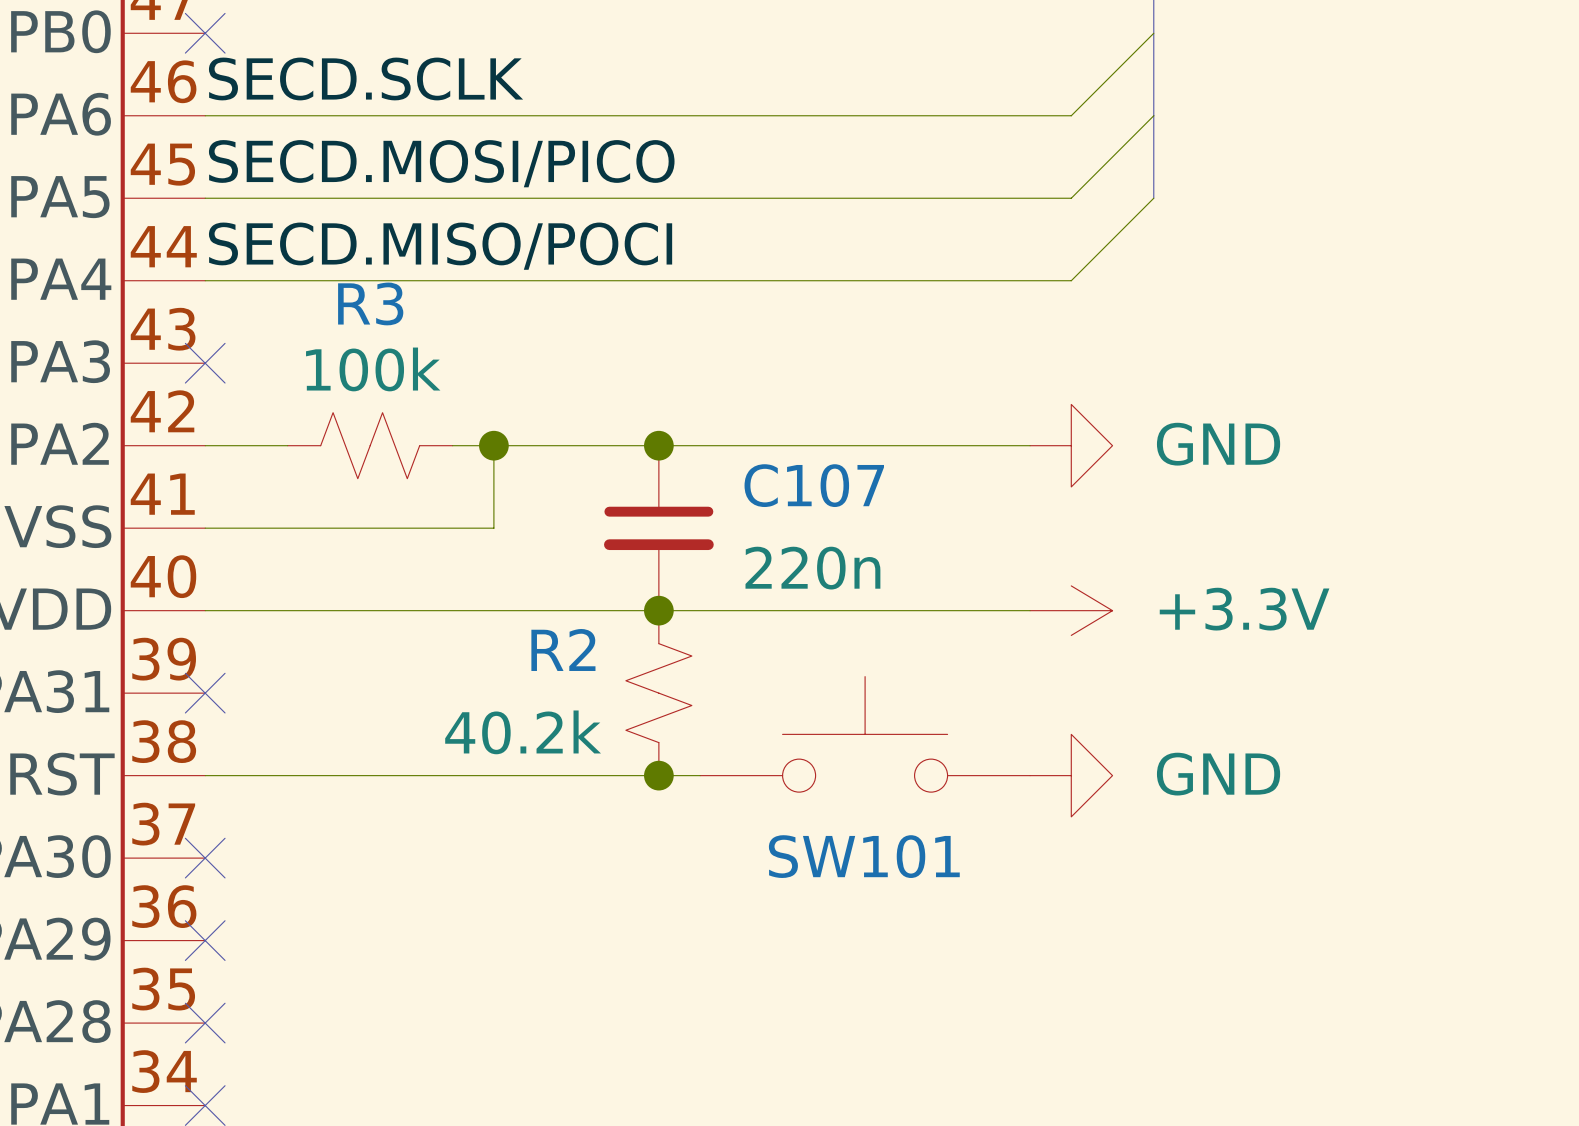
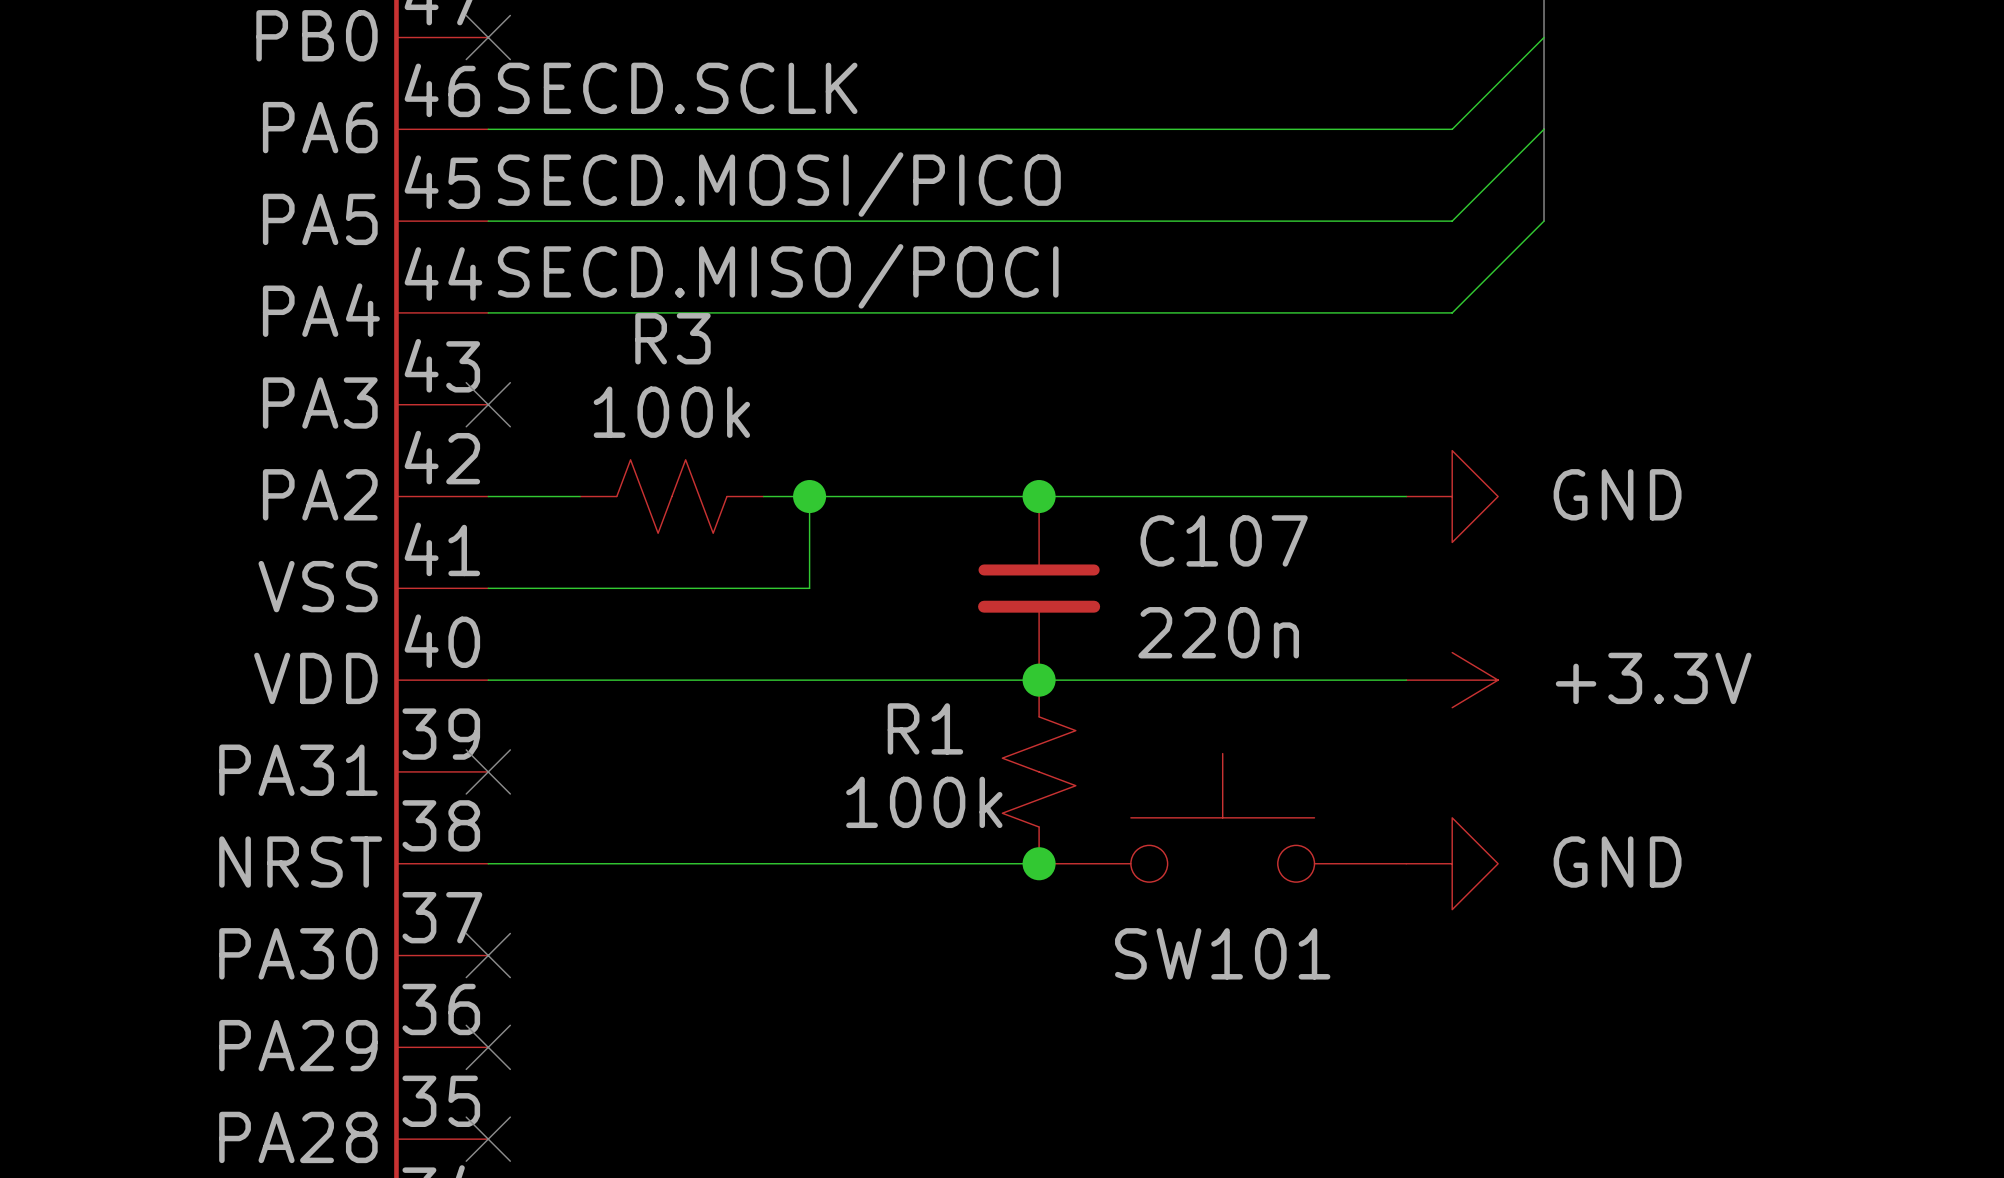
junction position: (658, 445) -> (1039, 496)
C107 position: (658, 528) -> (1039, 588)
junction position: (658, 610) -> (1039, 680)
R2: 40.2k (658, 693) -> none
R1: none -> 100k (1039, 771)
junction position: (658, 775) -> (1039, 863)

